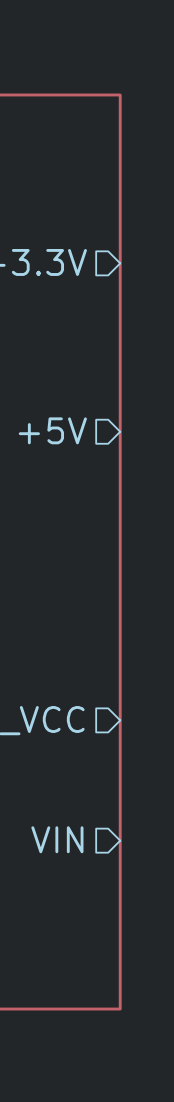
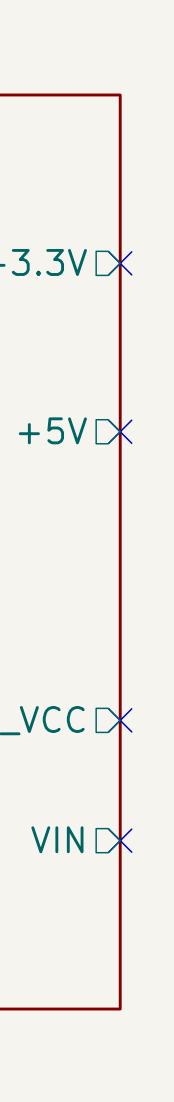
no-connect mark: none -> (120, 263)
no-connect mark: none -> (120, 431)
no-connect mark: none -> (120, 720)
no-connect mark: none -> (120, 840)

